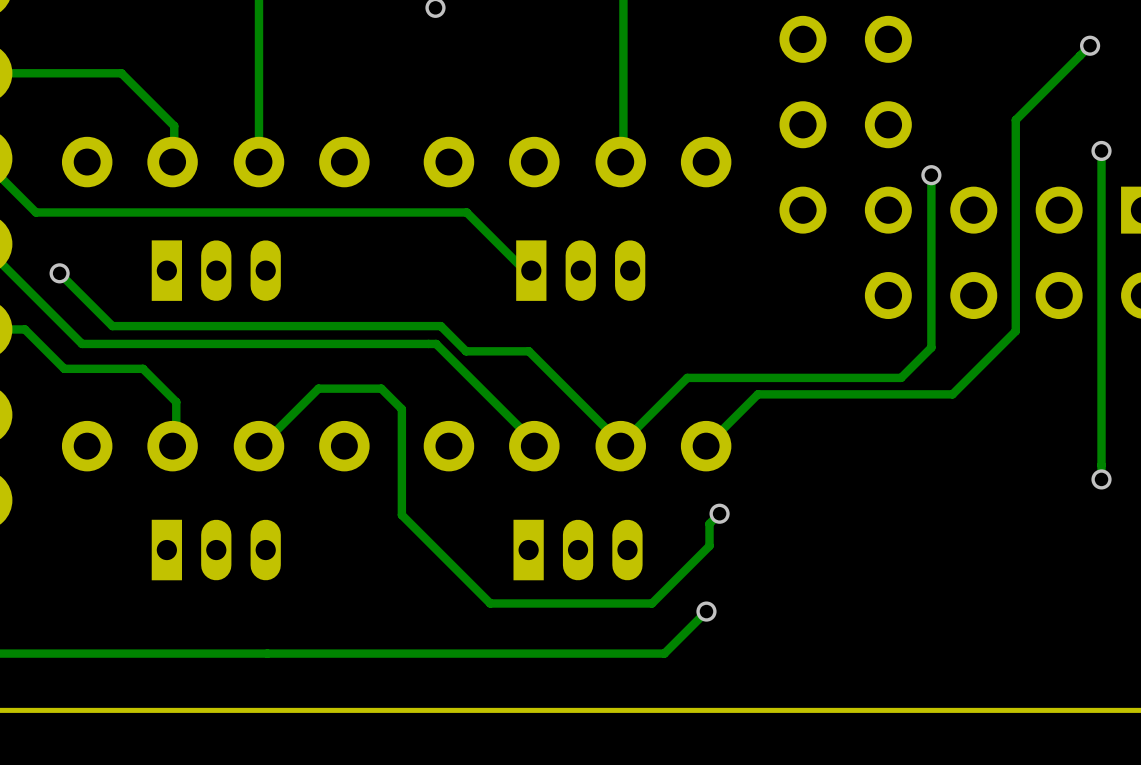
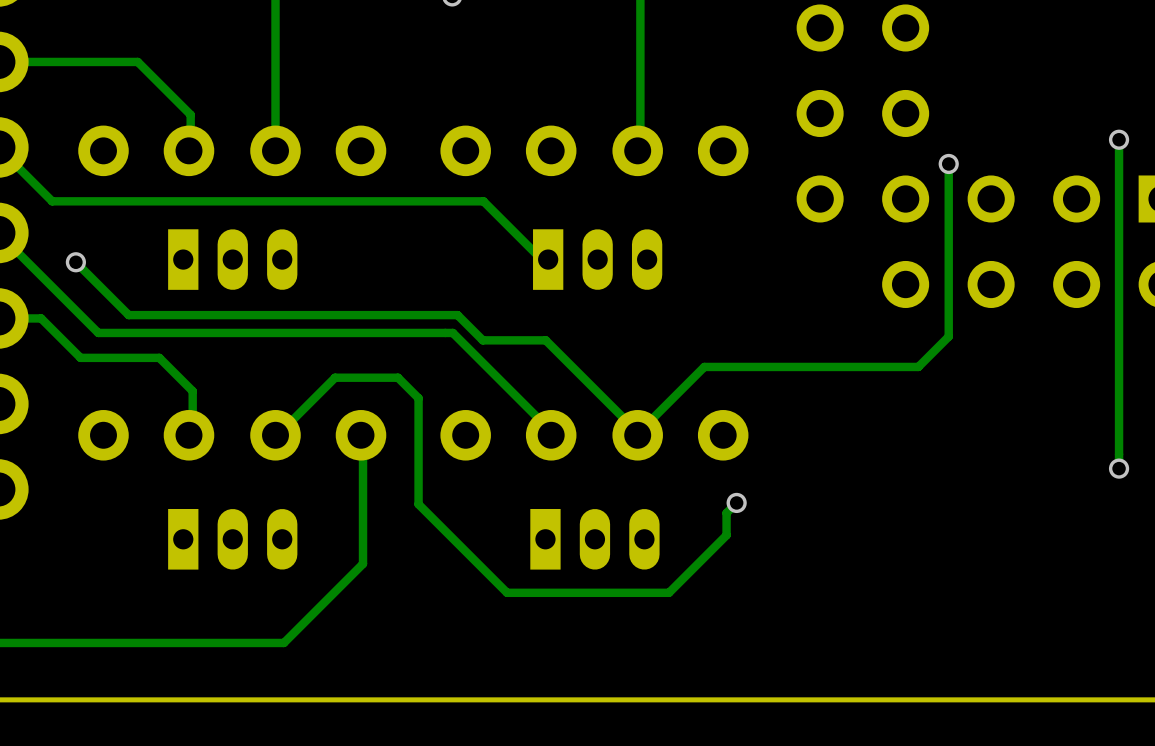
track: (1090, 45) (1015, 120) (1015, 331) (952, 394) (757, 394) (706, 446) -> none
via: (1090, 45) -> none
track: (706, 611) (664, 653) (267, 653) -> (363, 435) (363, 563) (283, 642)
via: (706, 611) -> none

